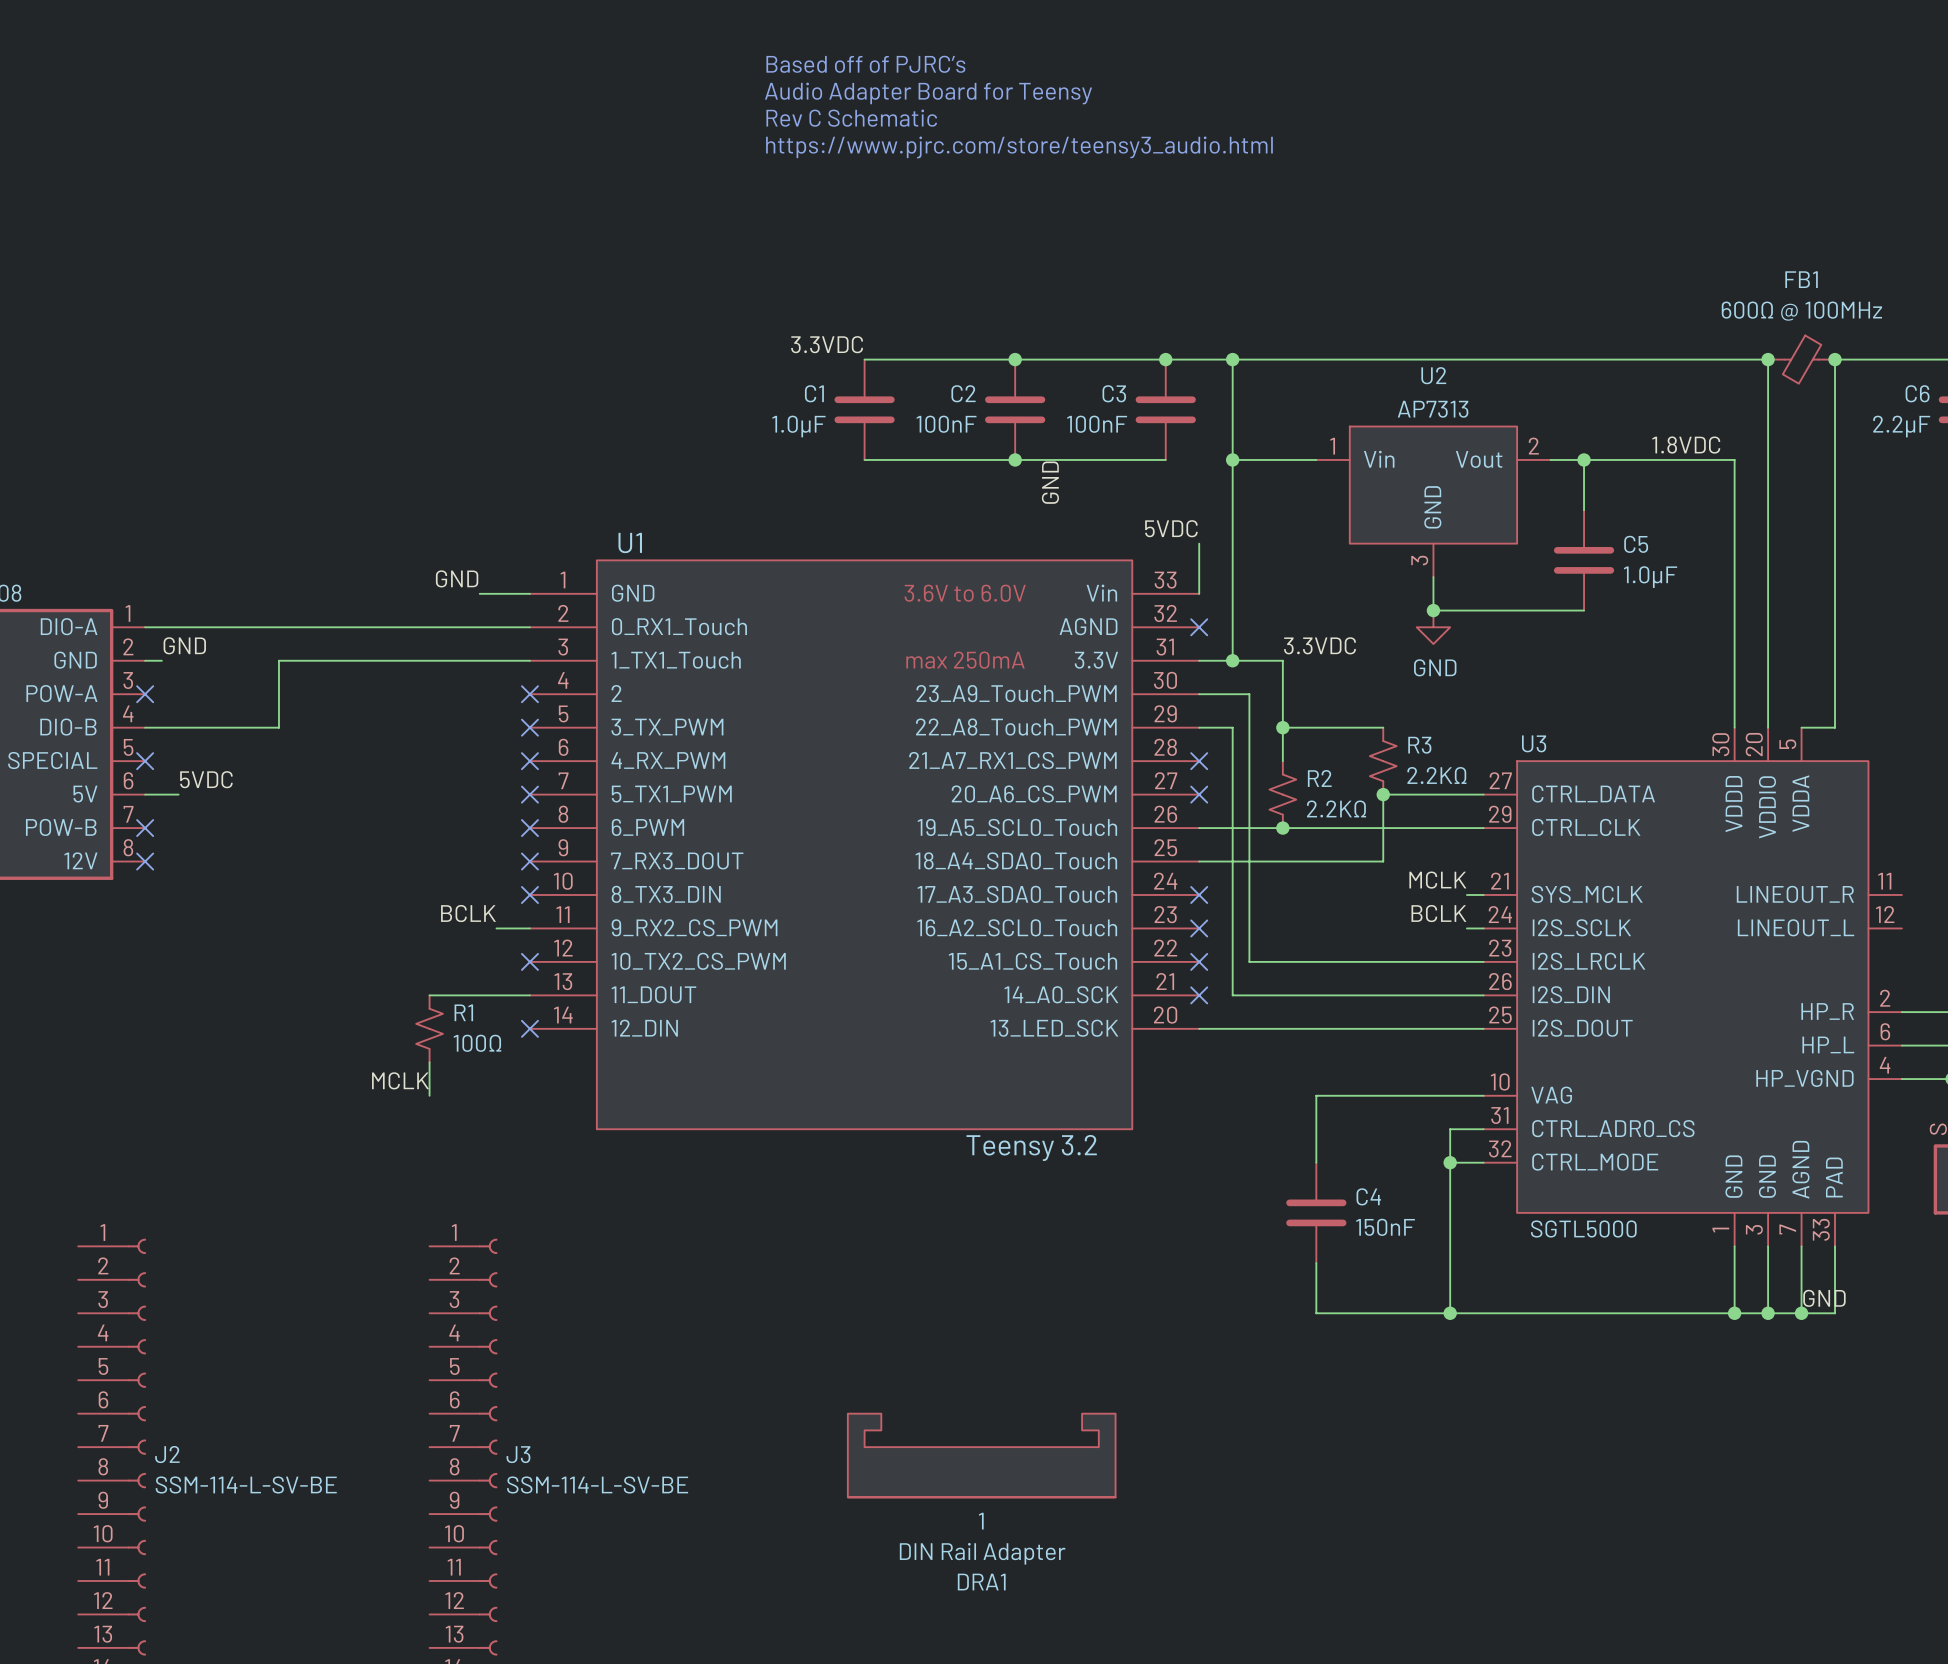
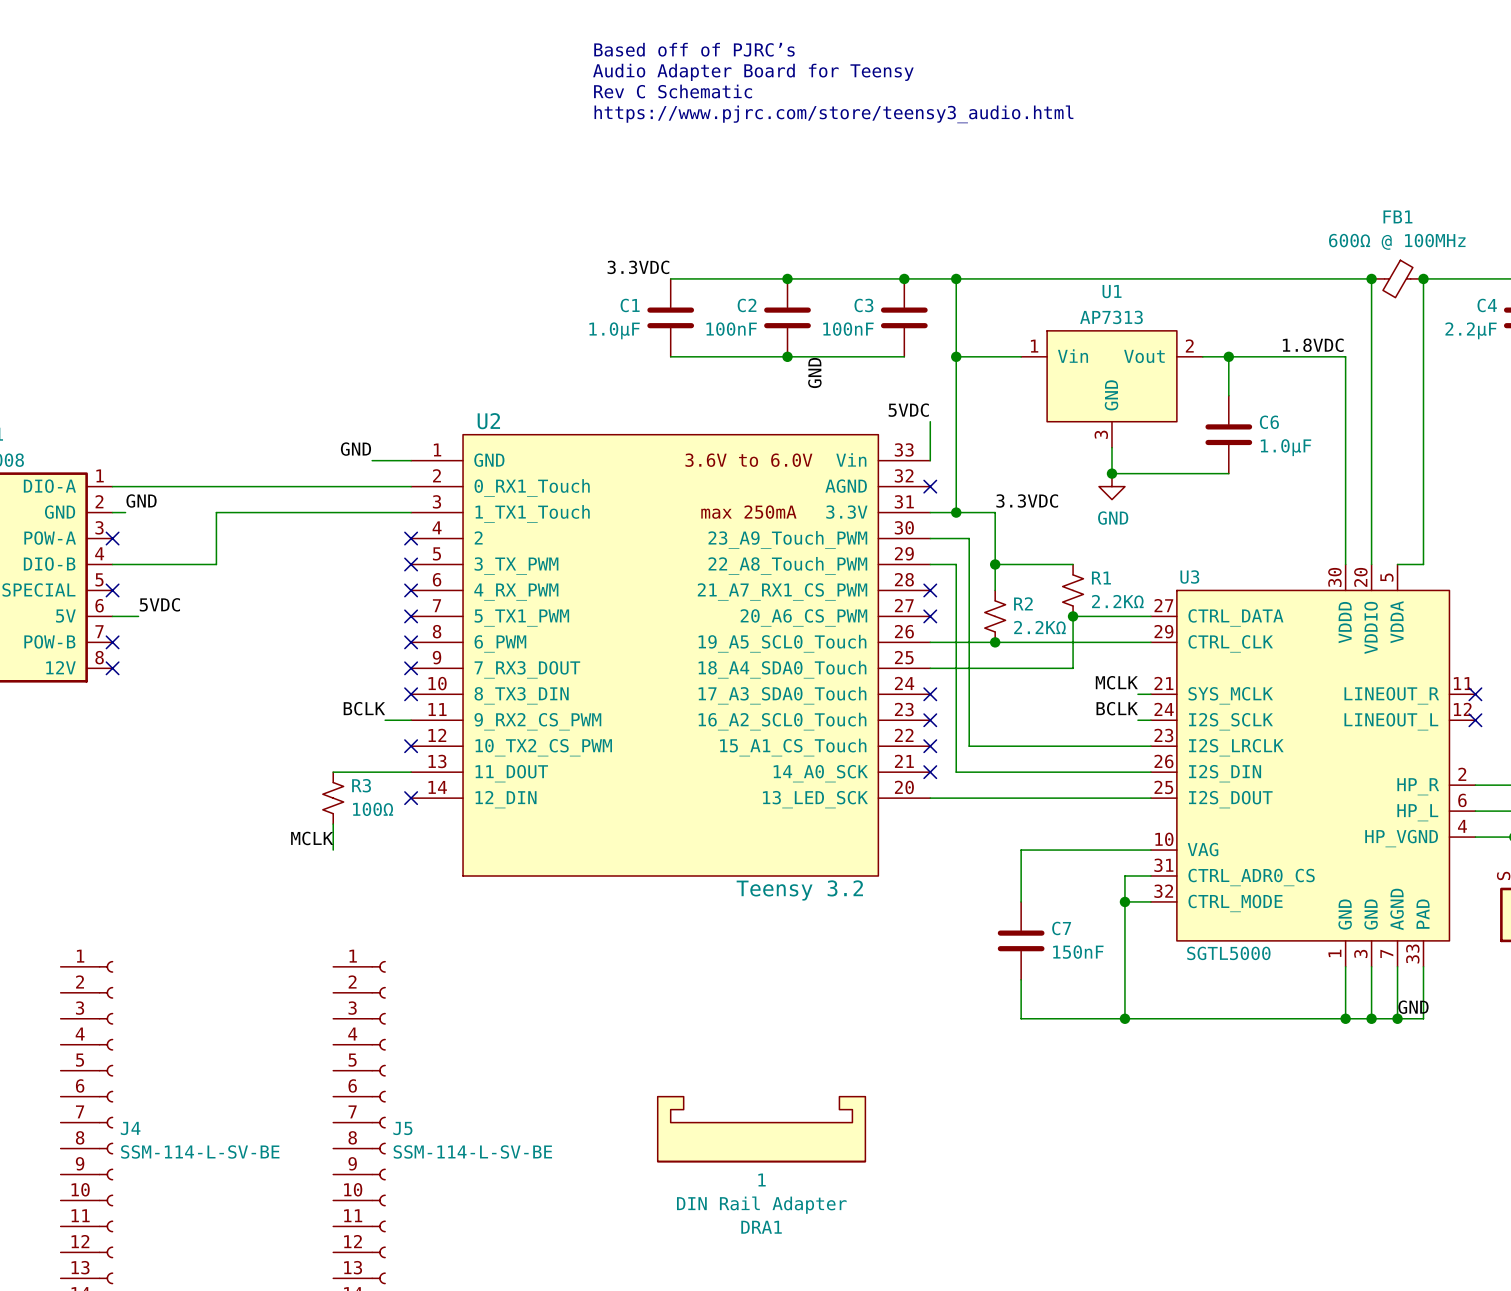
U2 name: U2 (1433, 375) -> U1 (1112, 291)
C6 name: C6 (1917, 393) -> C4 (1487, 305)
U1 name: U1 (630, 543) -> U2 (488, 421)
C5 name: C5 (1636, 544) -> C6 (1269, 422)
R3 name: R3 (1419, 745) -> R1 (1101, 578)
no-connect mark: none -> (1475, 694)
no-connect mark: none -> (1475, 720)
R1 name: R1 (463, 1012) -> R3 (361, 785)
C4 name: C4 (1368, 1196) -> C7 (1061, 928)
J2 name: J2 (167, 1454) -> J4 (130, 1128)
J3 name: J3 (518, 1454) -> J5 (402, 1128)

